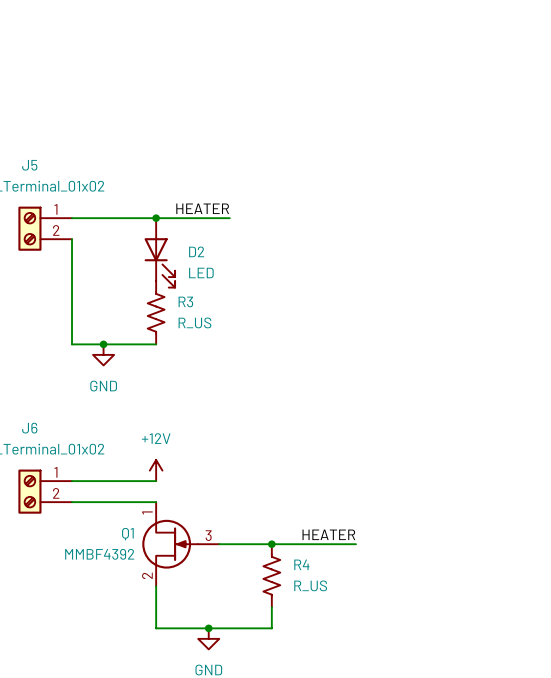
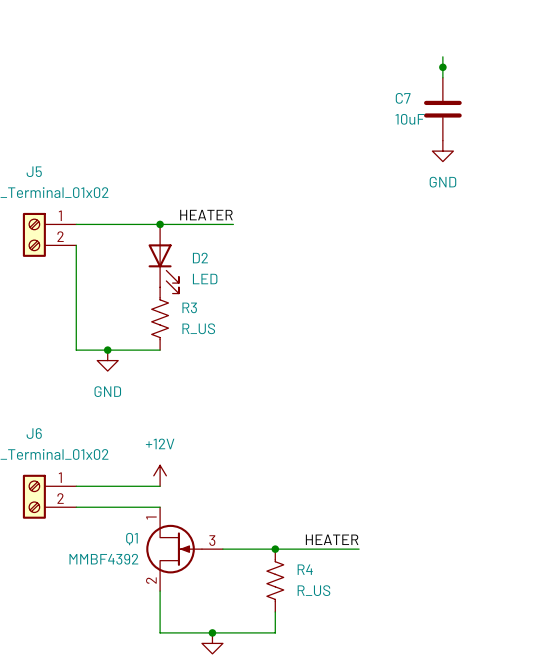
wire: none -> (442, 56) (442, 77)
junction: none -> (442, 67)
C7: none -> 10uF (442, 109)
power symbol: none -> GND (442, 151)

